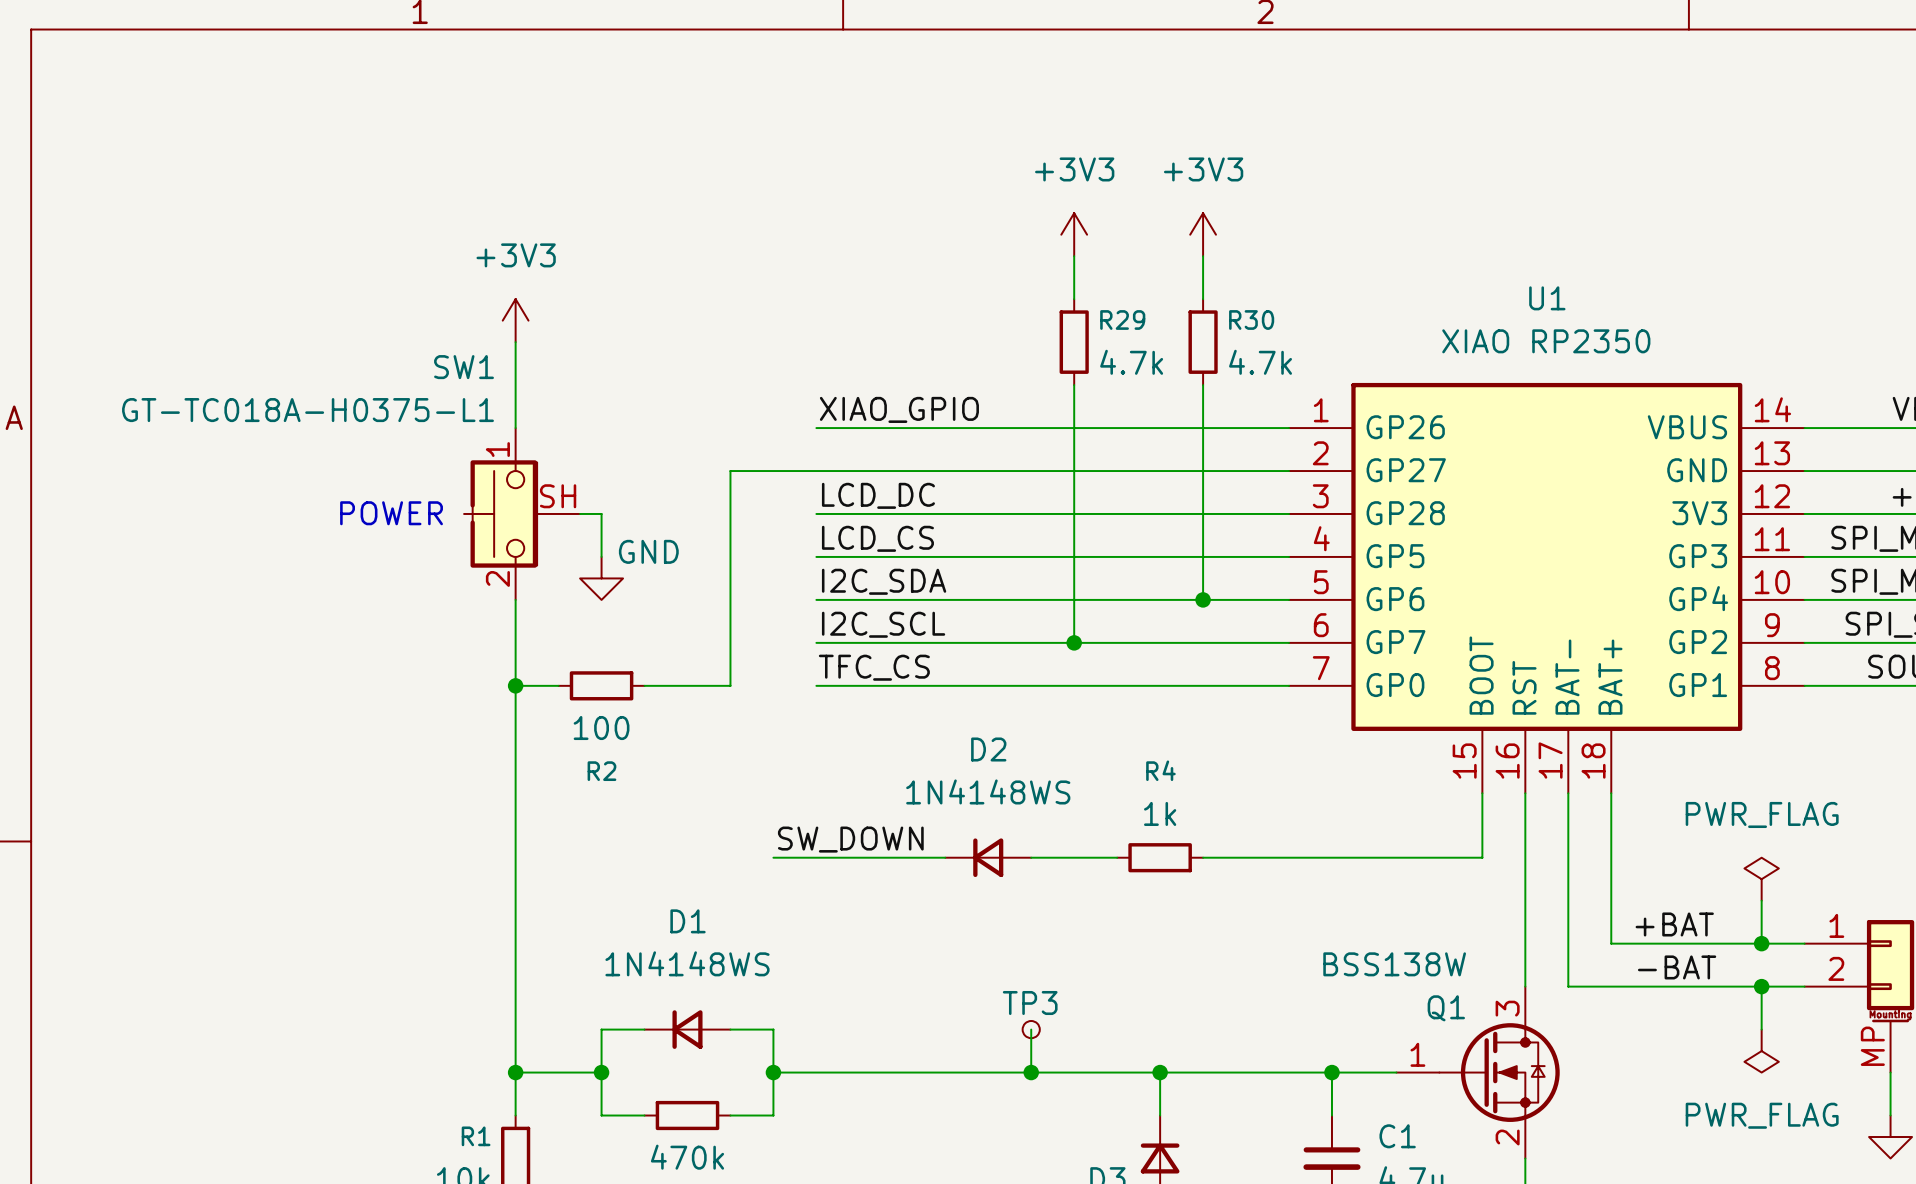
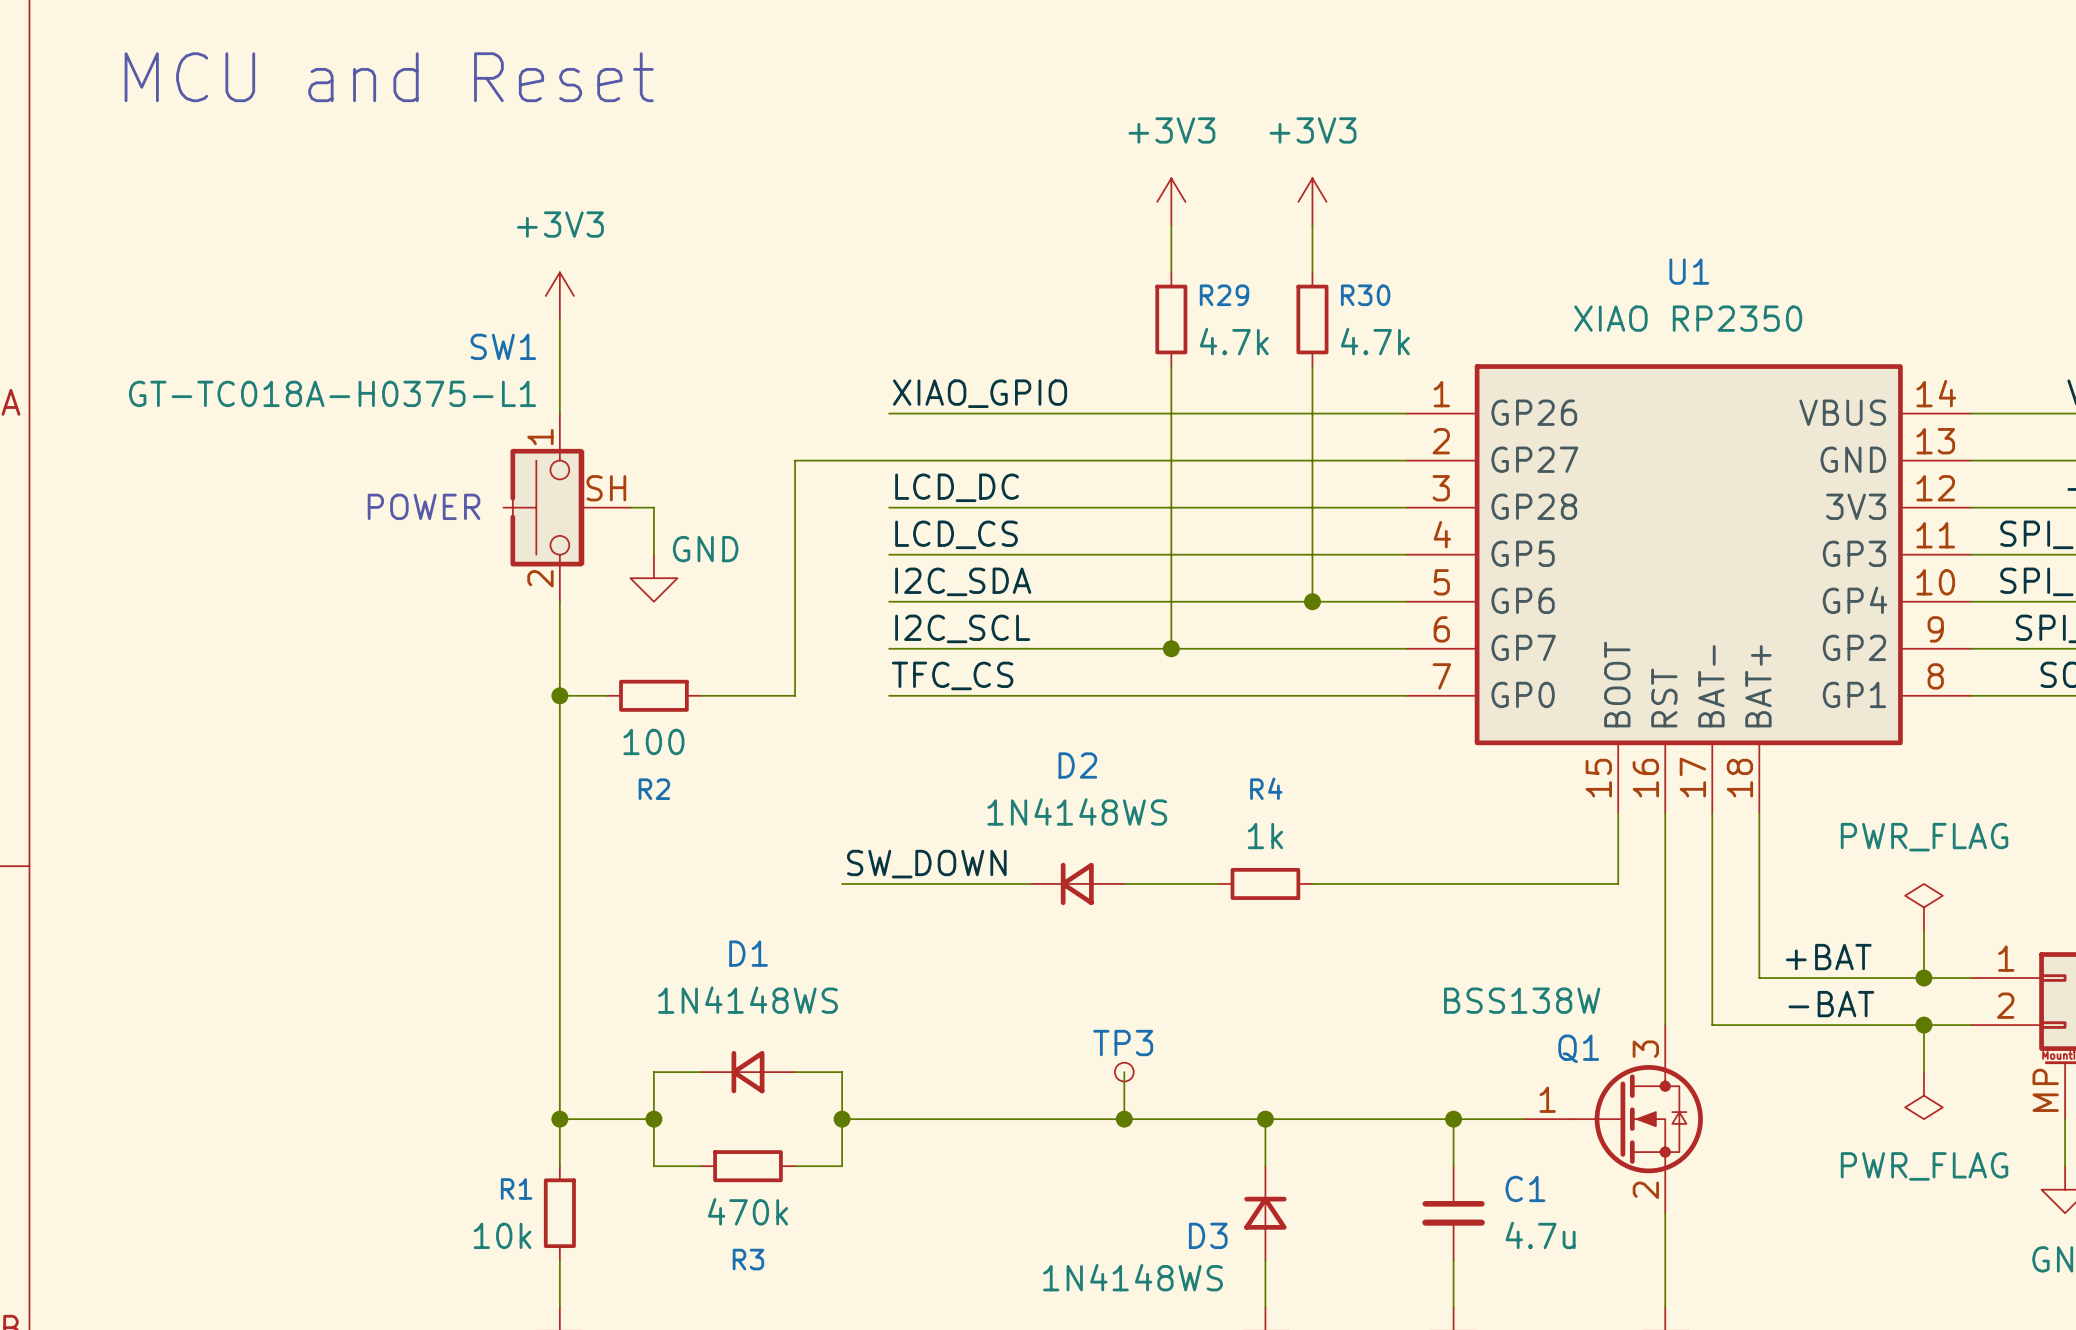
text: none -> MCU and Reset (389, 77)

